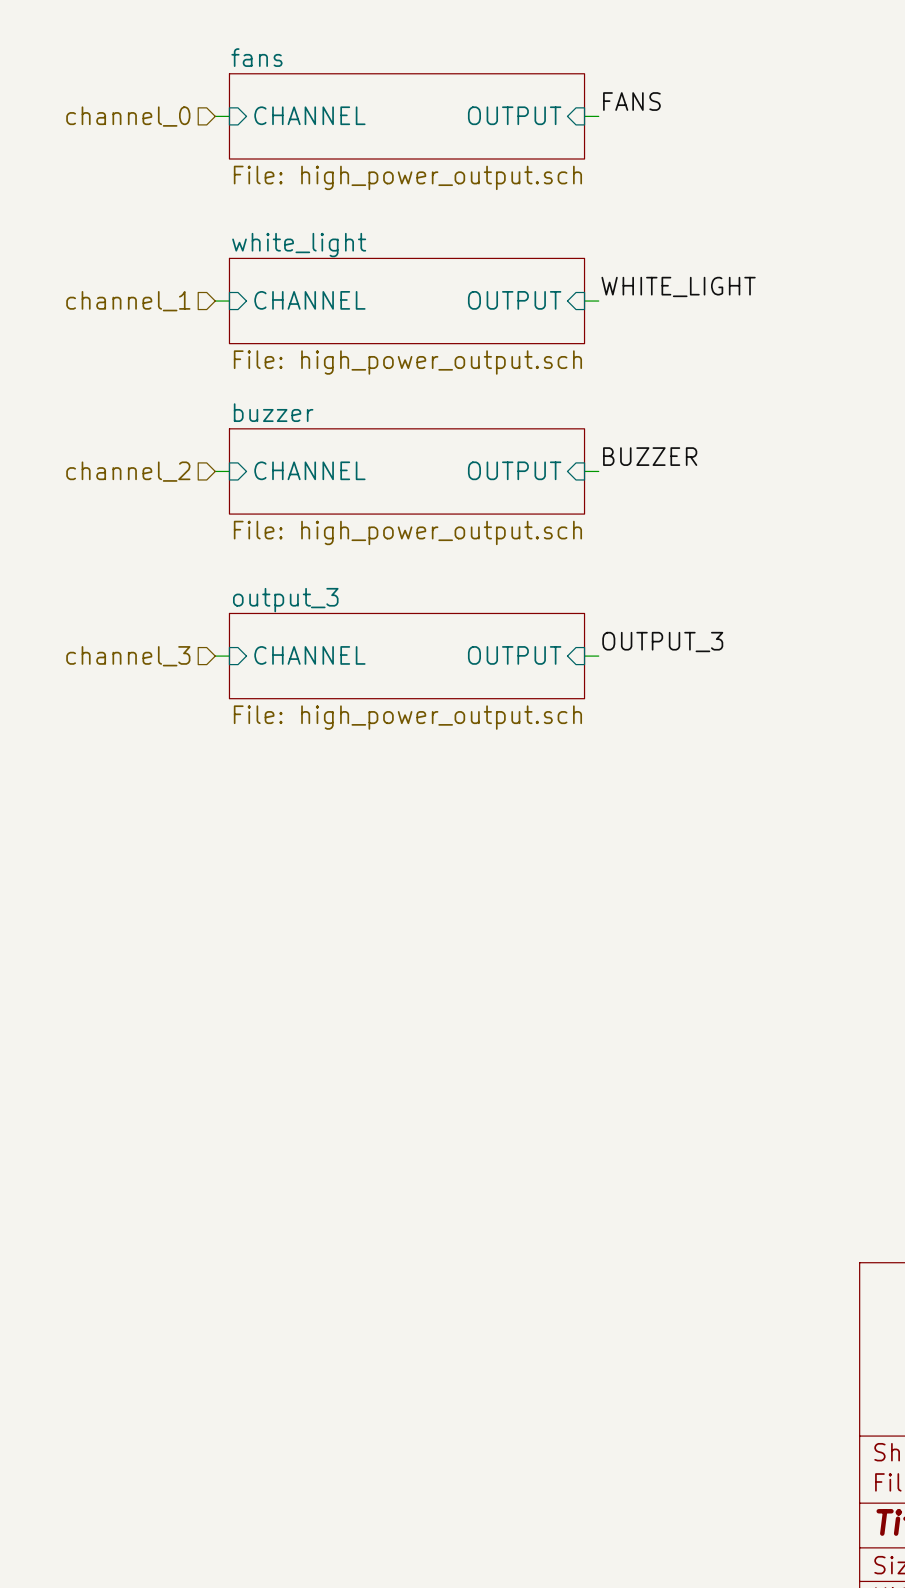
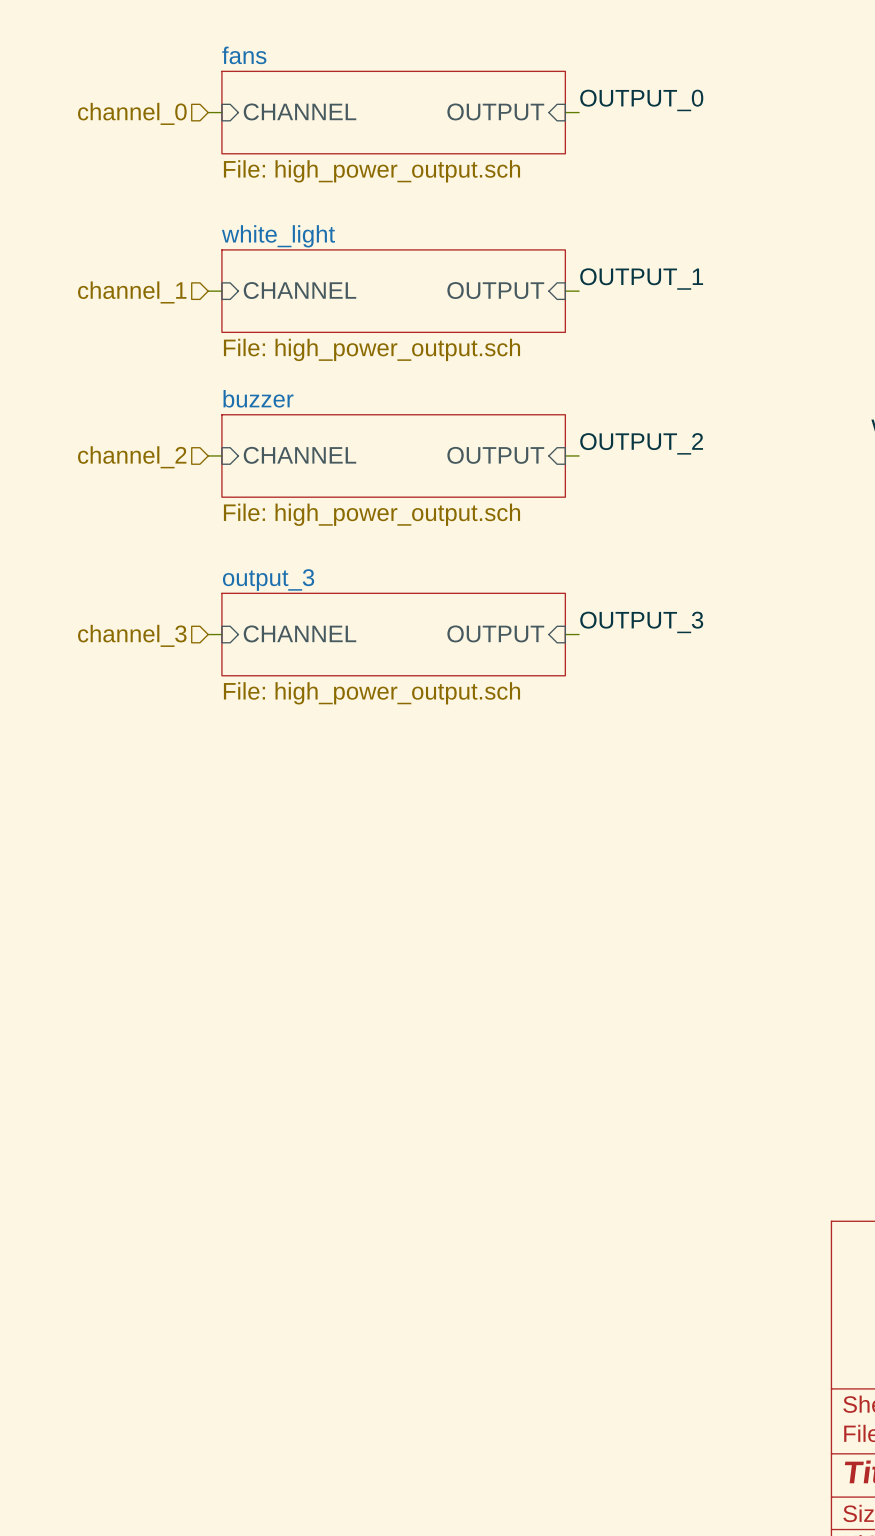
label: FANS (631, 101) -> OUTPUT_0 (641, 100)
label: WHITE_LIGHT (678, 286) -> OUTPUT_1 (641, 279)
label: BUZZER (650, 456) -> OUTPUT_2 (641, 443)

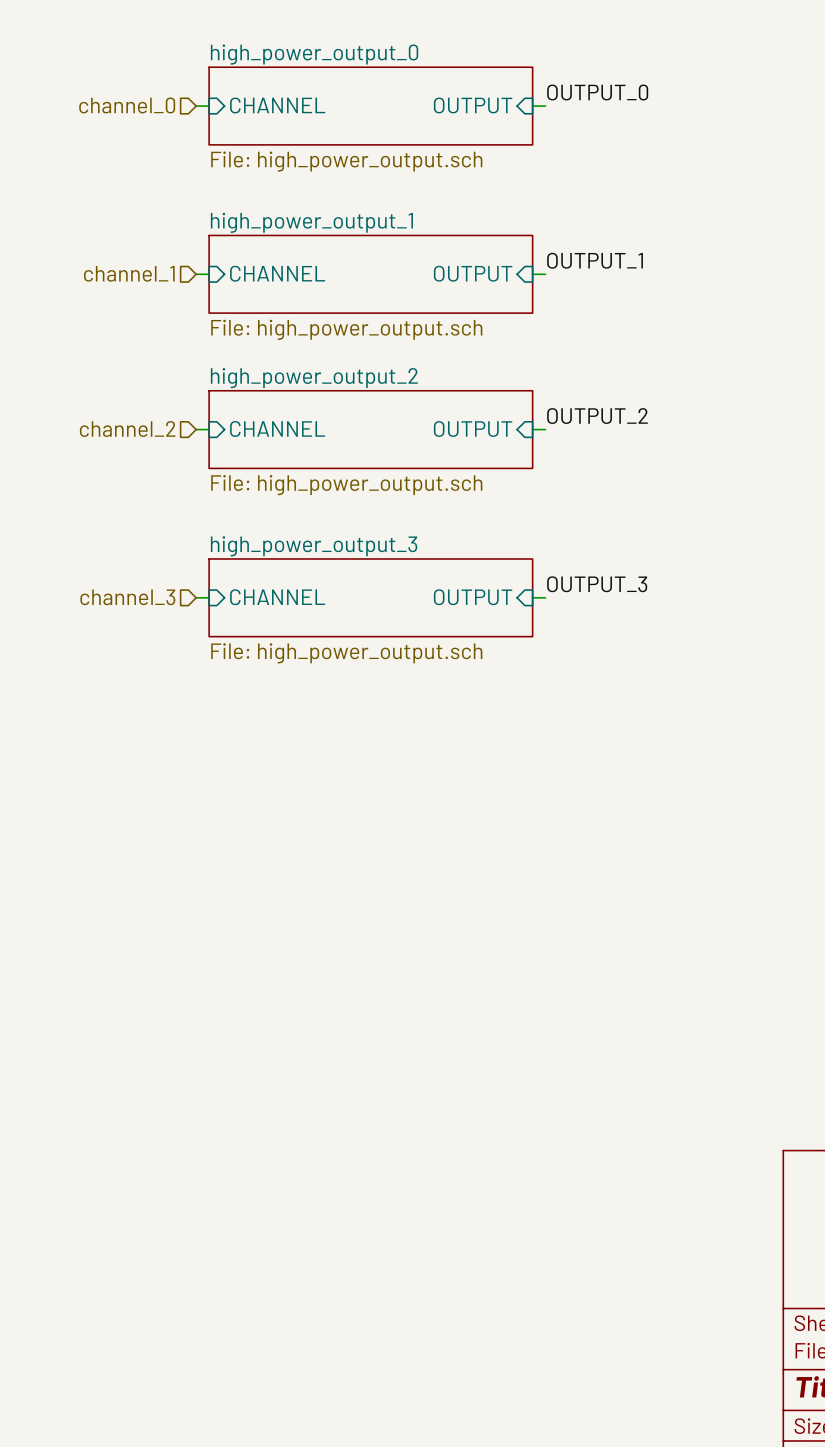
sheet fans name: fans (244, 55) -> high_power_output_0 (314, 54)
sheet white_light name: white_light (278, 236) -> high_power_output_1 (311, 222)
sheet buzzer name: buzzer (258, 398) -> high_power_output_2 (314, 378)
sheet output_3 name: output_3 (268, 580) -> high_power_output_3 (314, 546)

